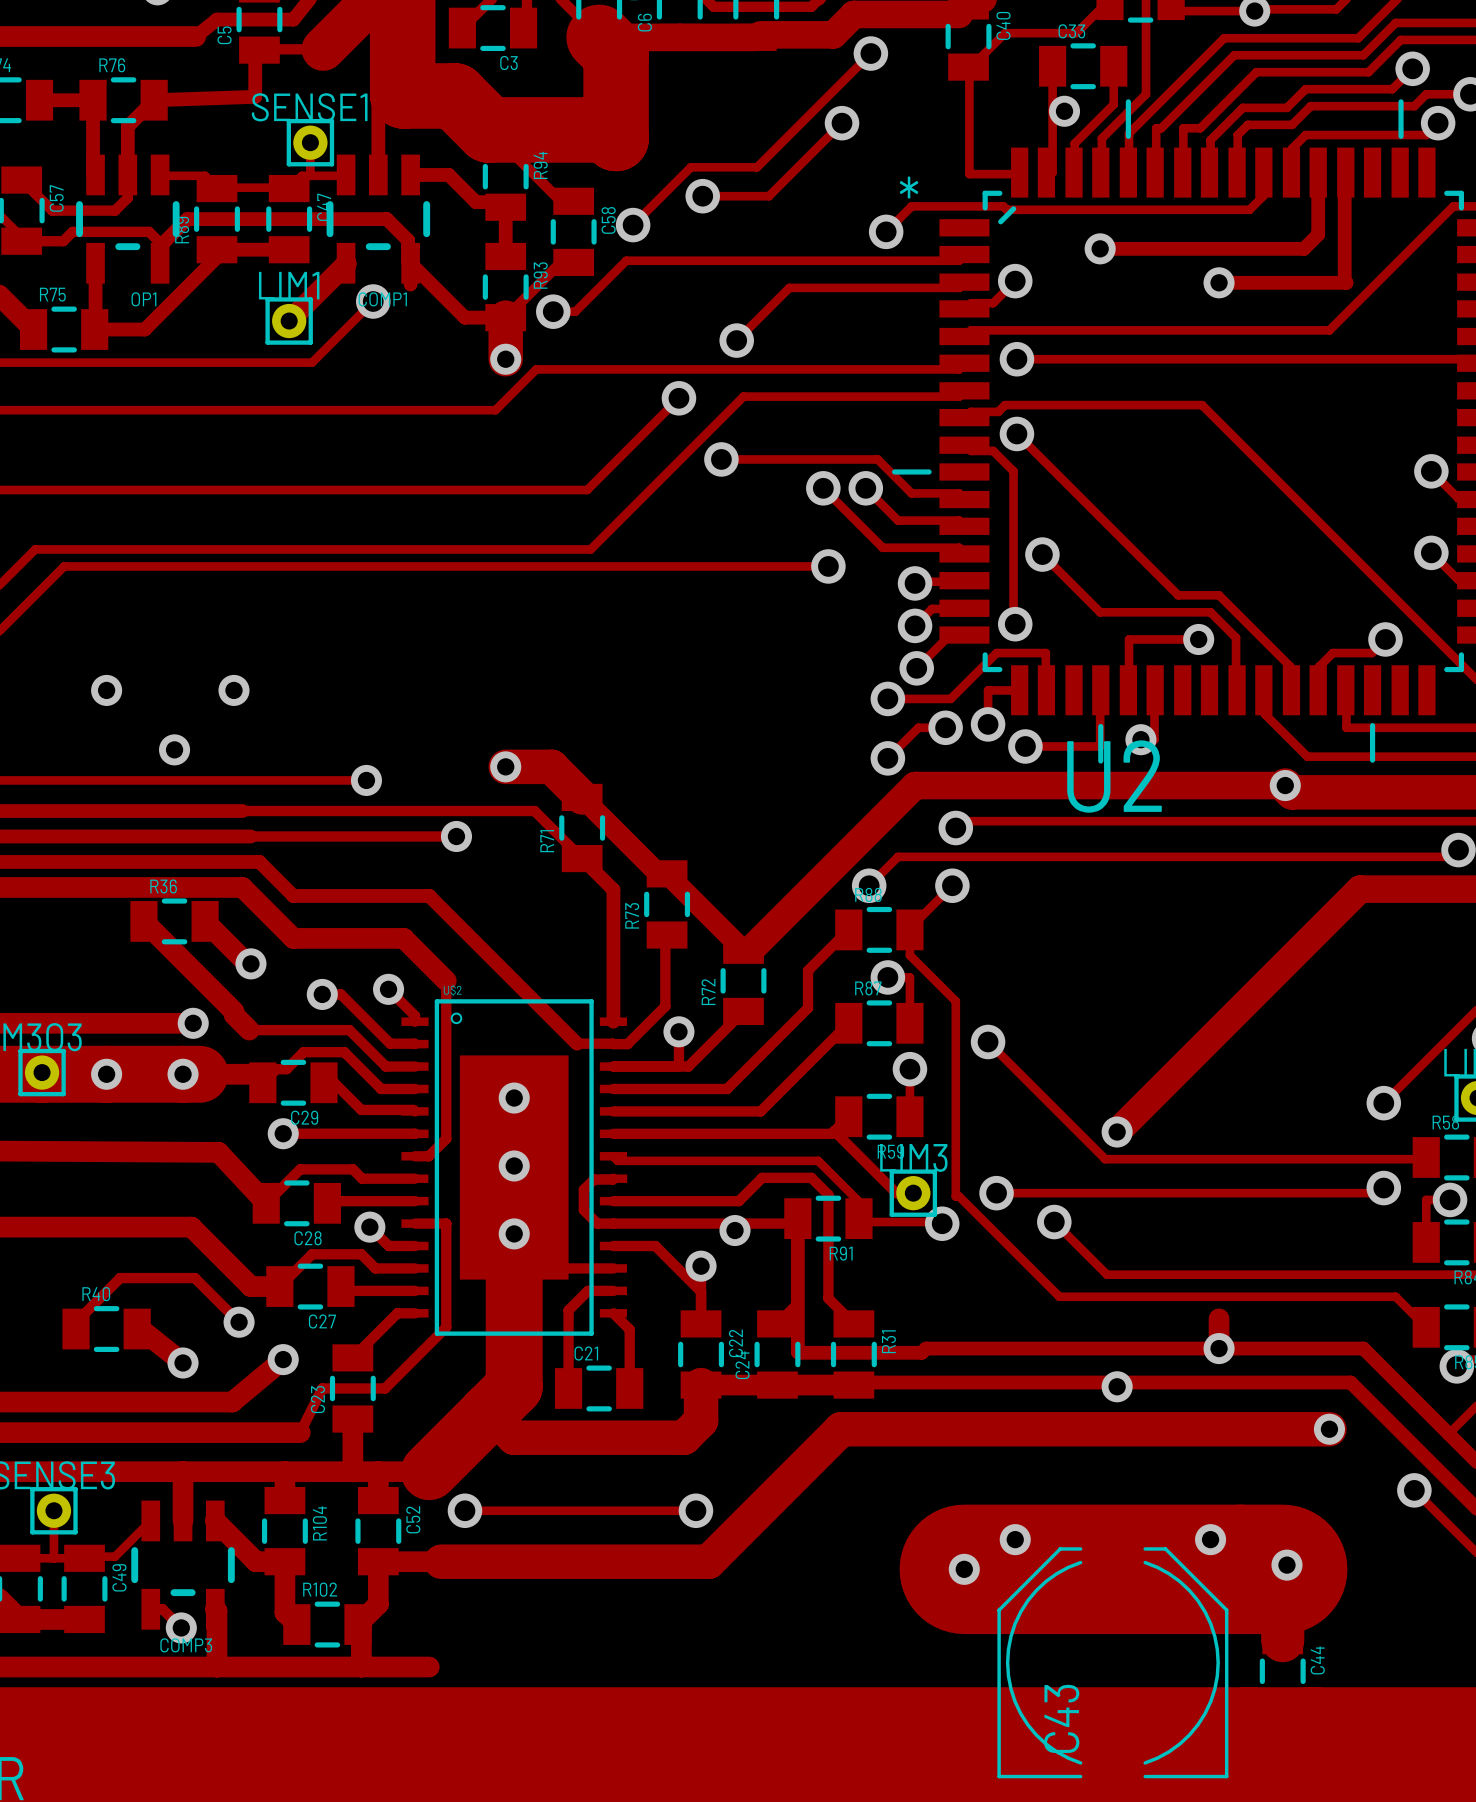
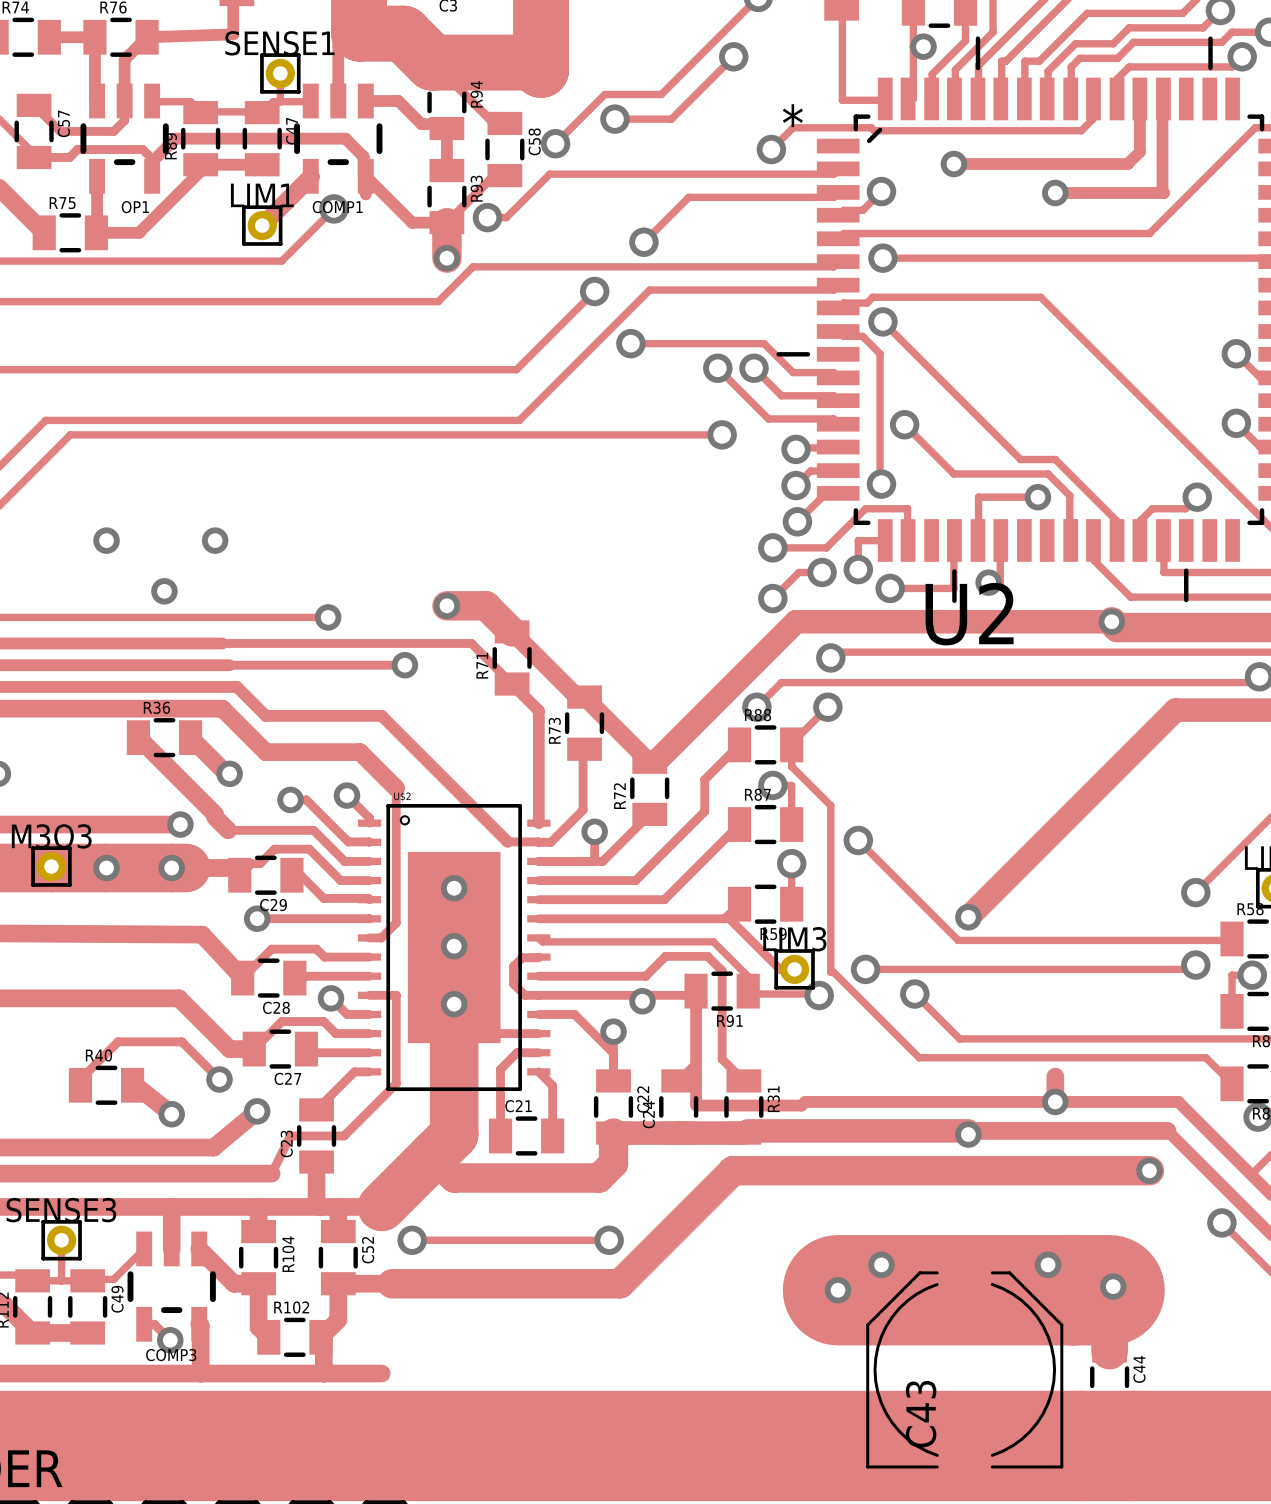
track width: thin (858, 1382) (1350, 1382) -> thick (747, 1130) (1167, 1130)
track width: thin (701, 1385) (853, 1385) -> thick (613, 1133) (743, 1133)

